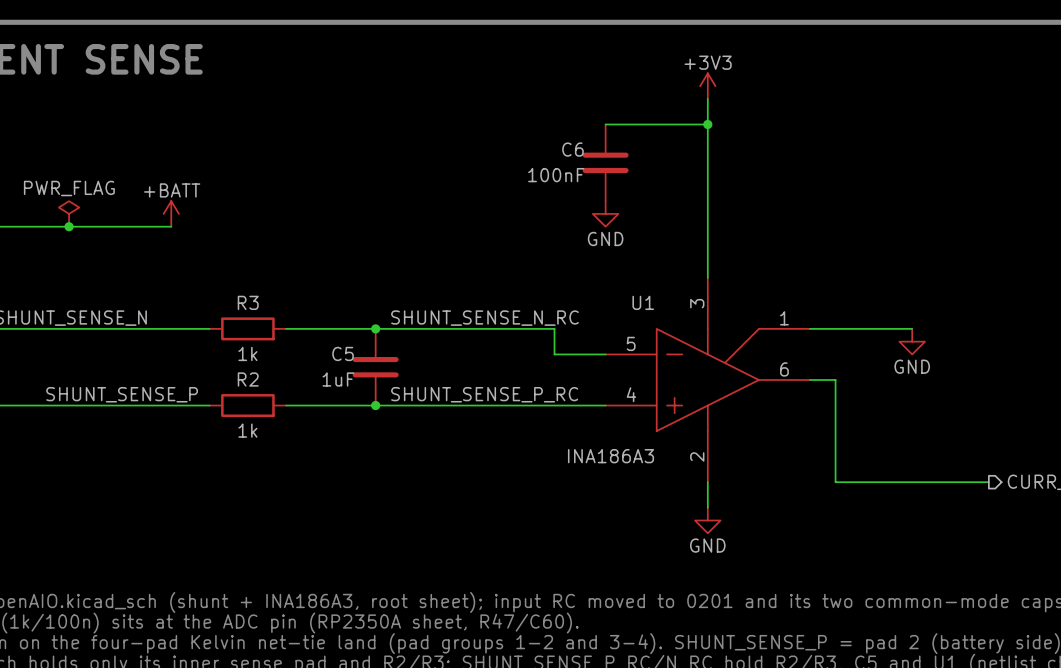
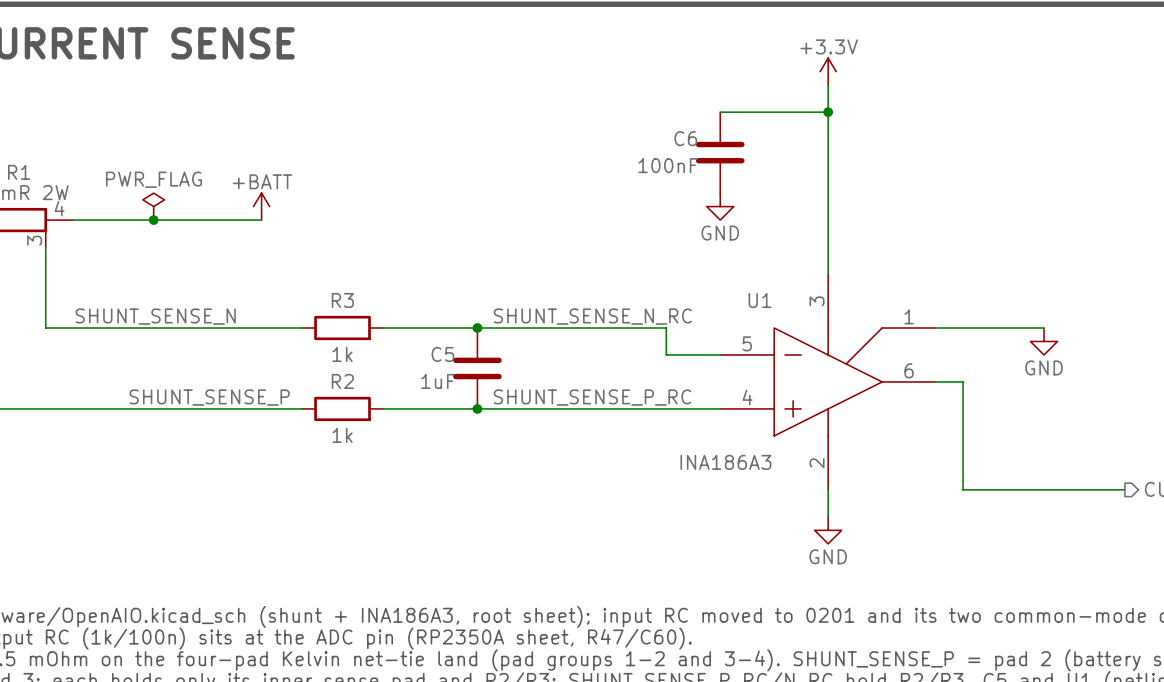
power symbol: +3V3 (707, 86) -> +3.3V (828, 71)

